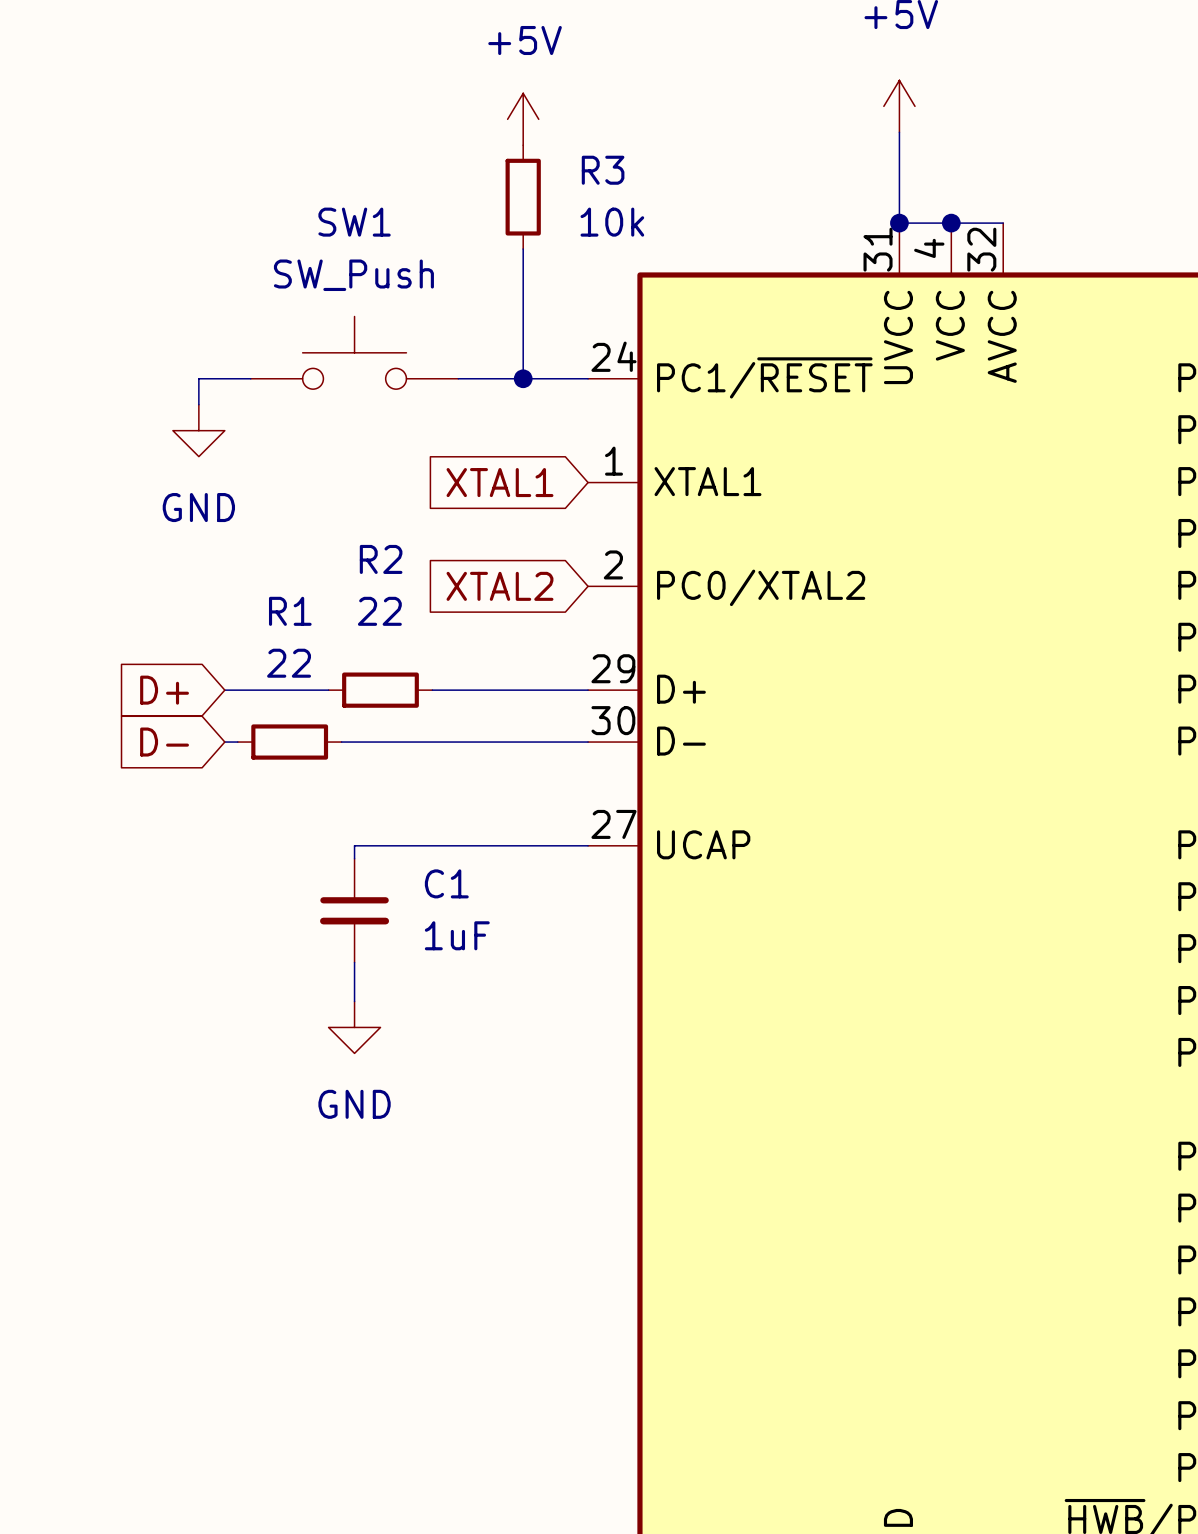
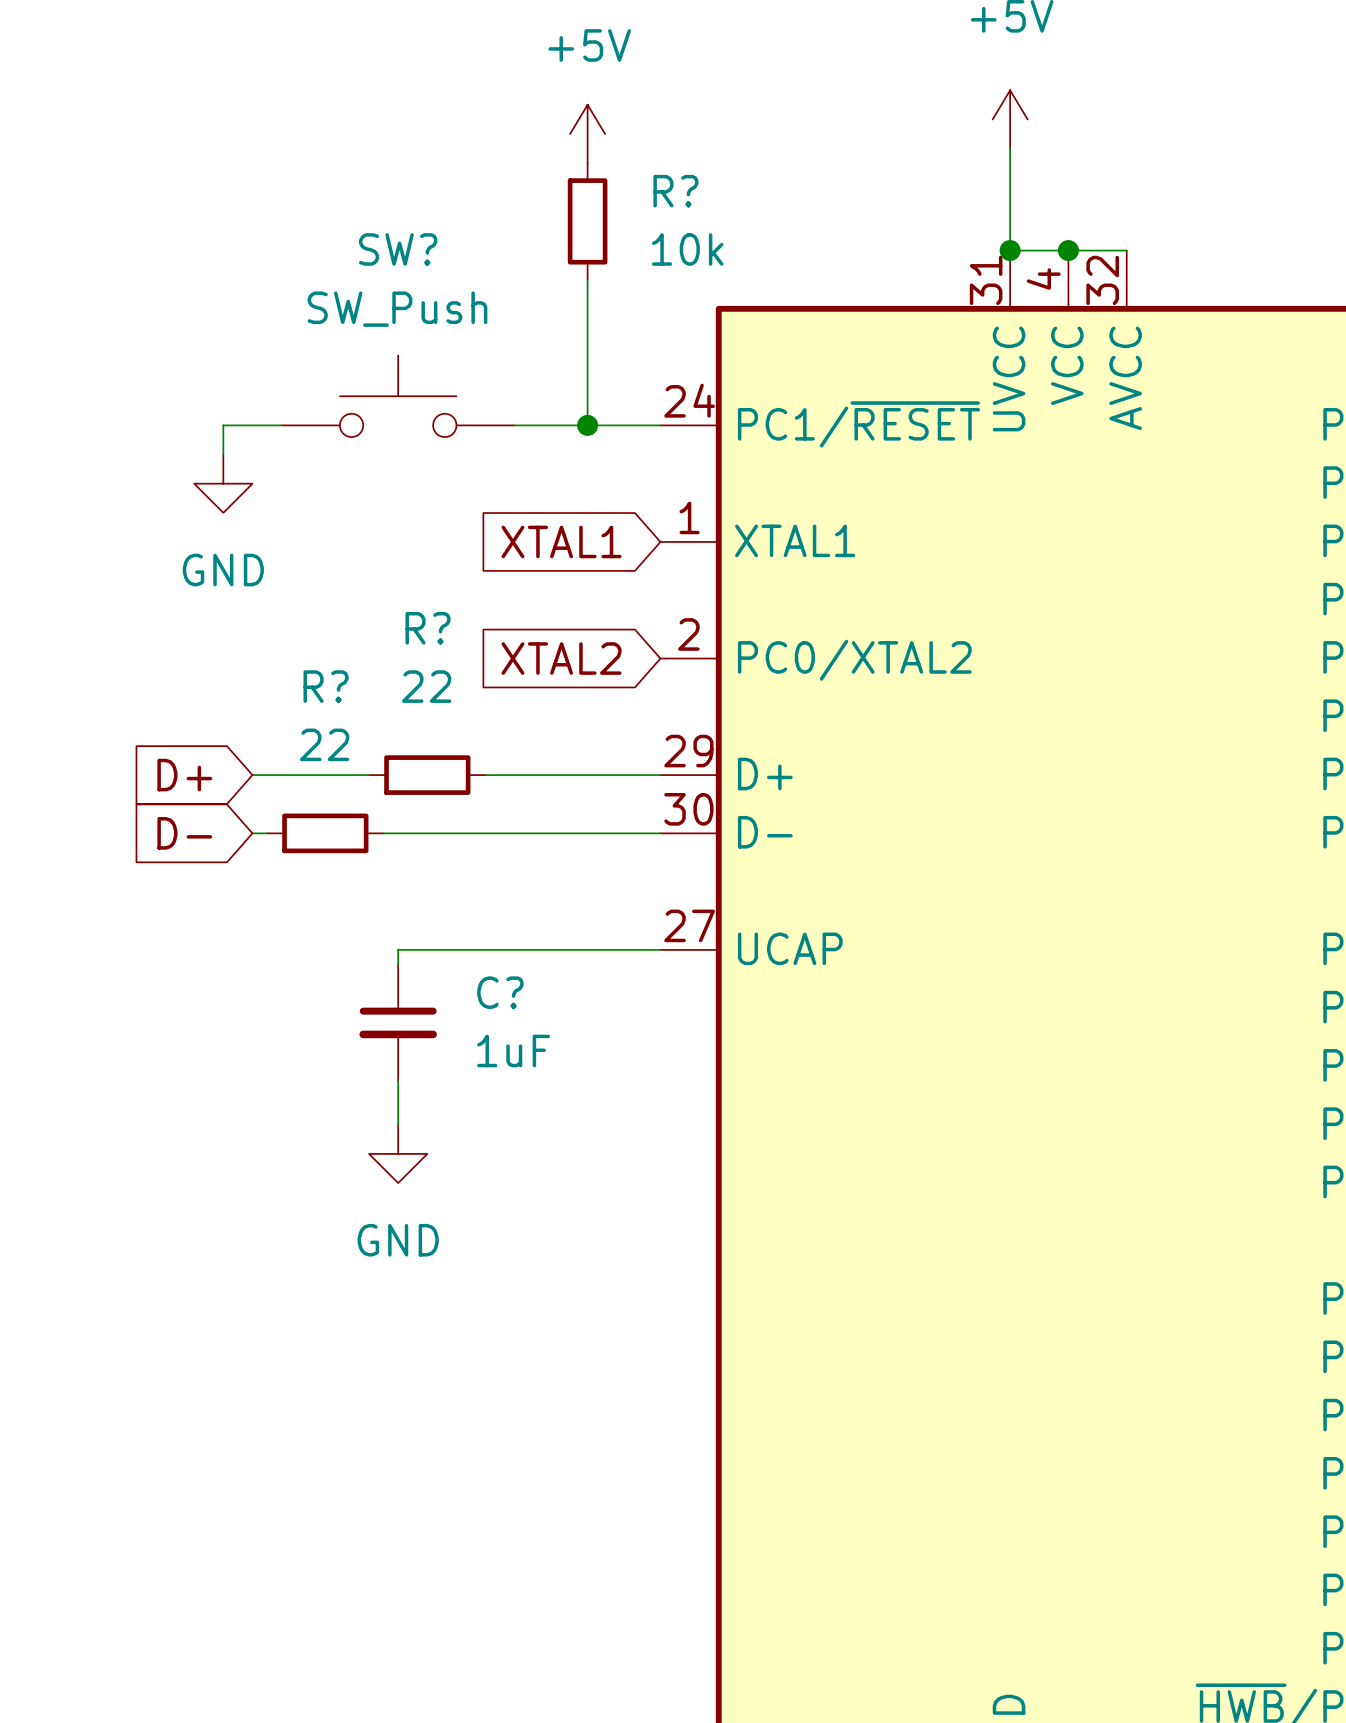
R3 name: R3 (603, 170) -> R? (675, 191)
SW1 name: SW1 (354, 222) -> SW? (398, 249)
R2 name: R2 (381, 559) -> R? (428, 628)
R1 name: R1 (290, 611) -> R? (326, 686)
C1 name: C1 (446, 883) -> C? (500, 992)

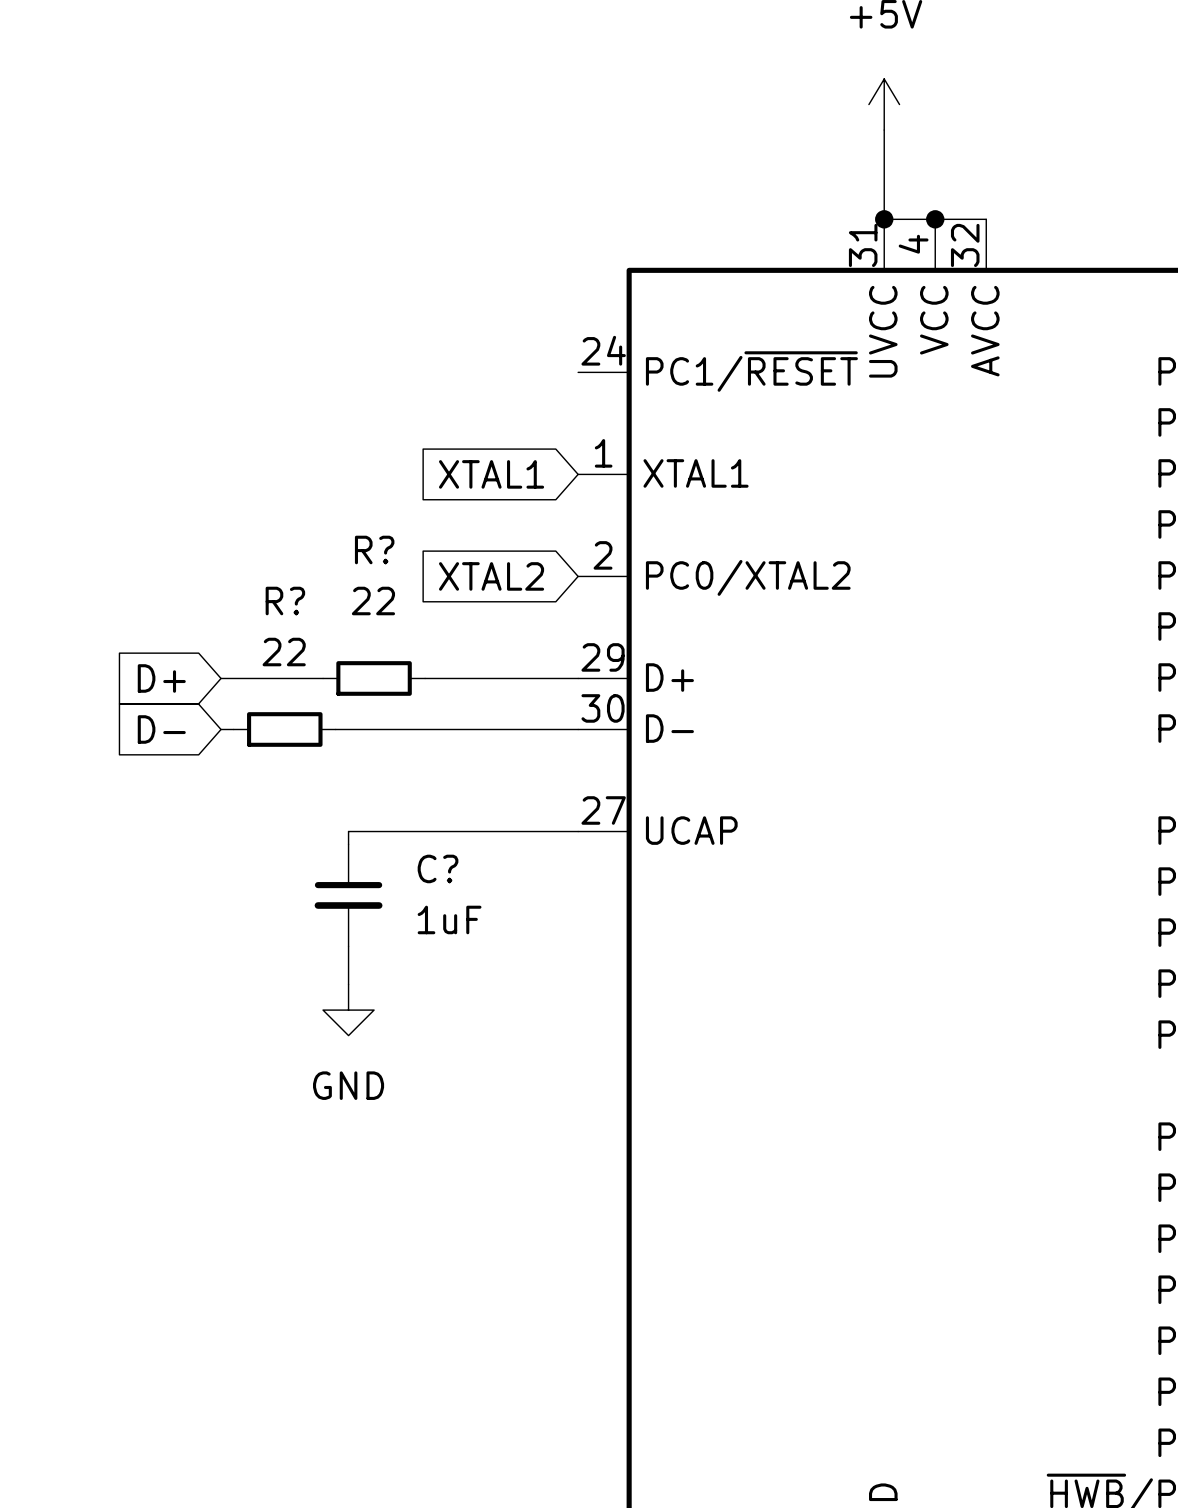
power symbol: +5V (587, 133) -> none
R?: 10k (587, 221) -> none
wire: (587, 279) (587, 425) -> none
SW?: SW_Push (398, 396) -> none
wire: (281, 425) (223, 425) (223, 454) -> none
wire: (514, 425) (660, 425) -> none
junction: (587, 425) -> none
power symbol: GND (223, 483) -> none

